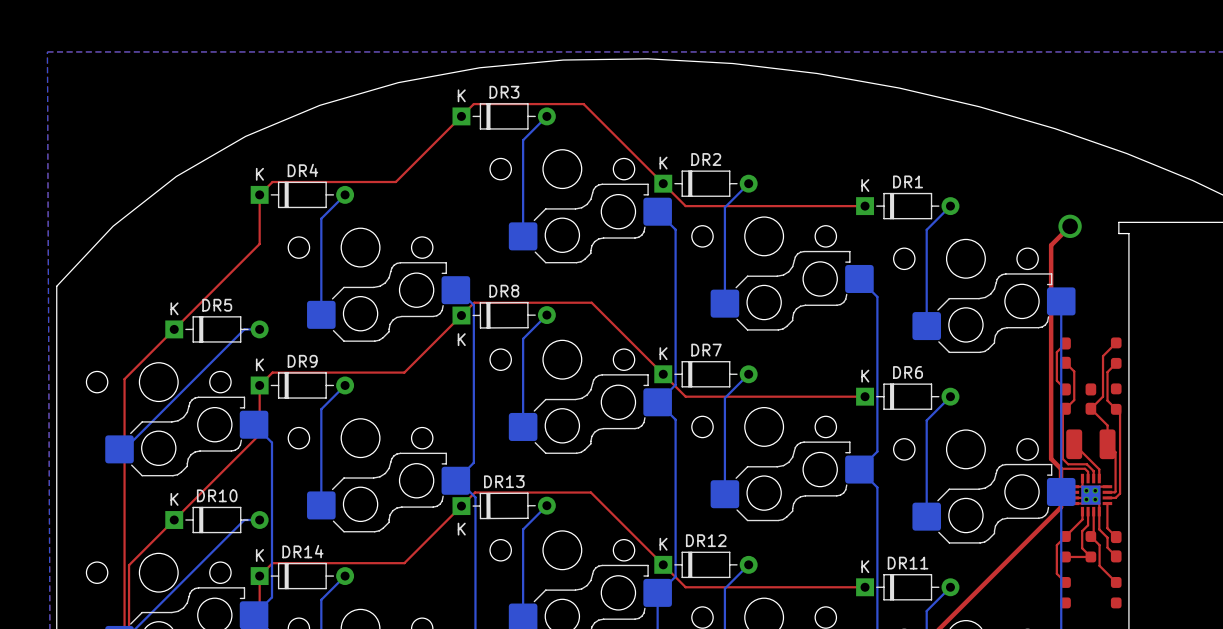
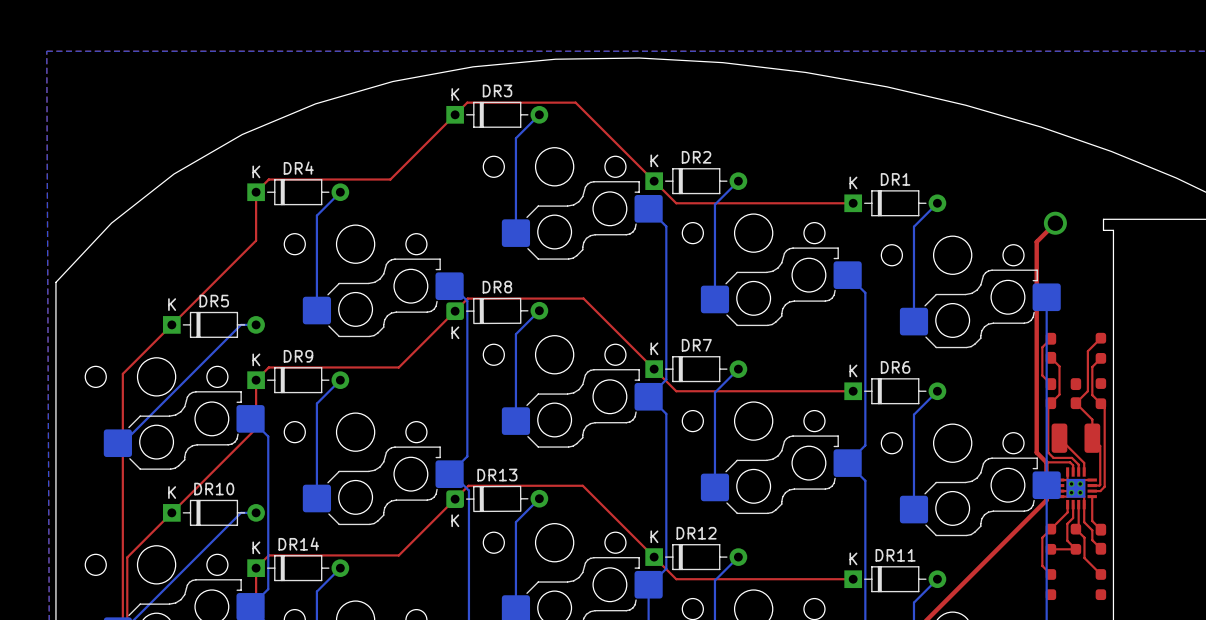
DR8 footprint: [452, 301, 556, 329] -> [446, 297, 549, 325]
DR13 footprint: [452, 492, 556, 520] -> [446, 485, 549, 513]

